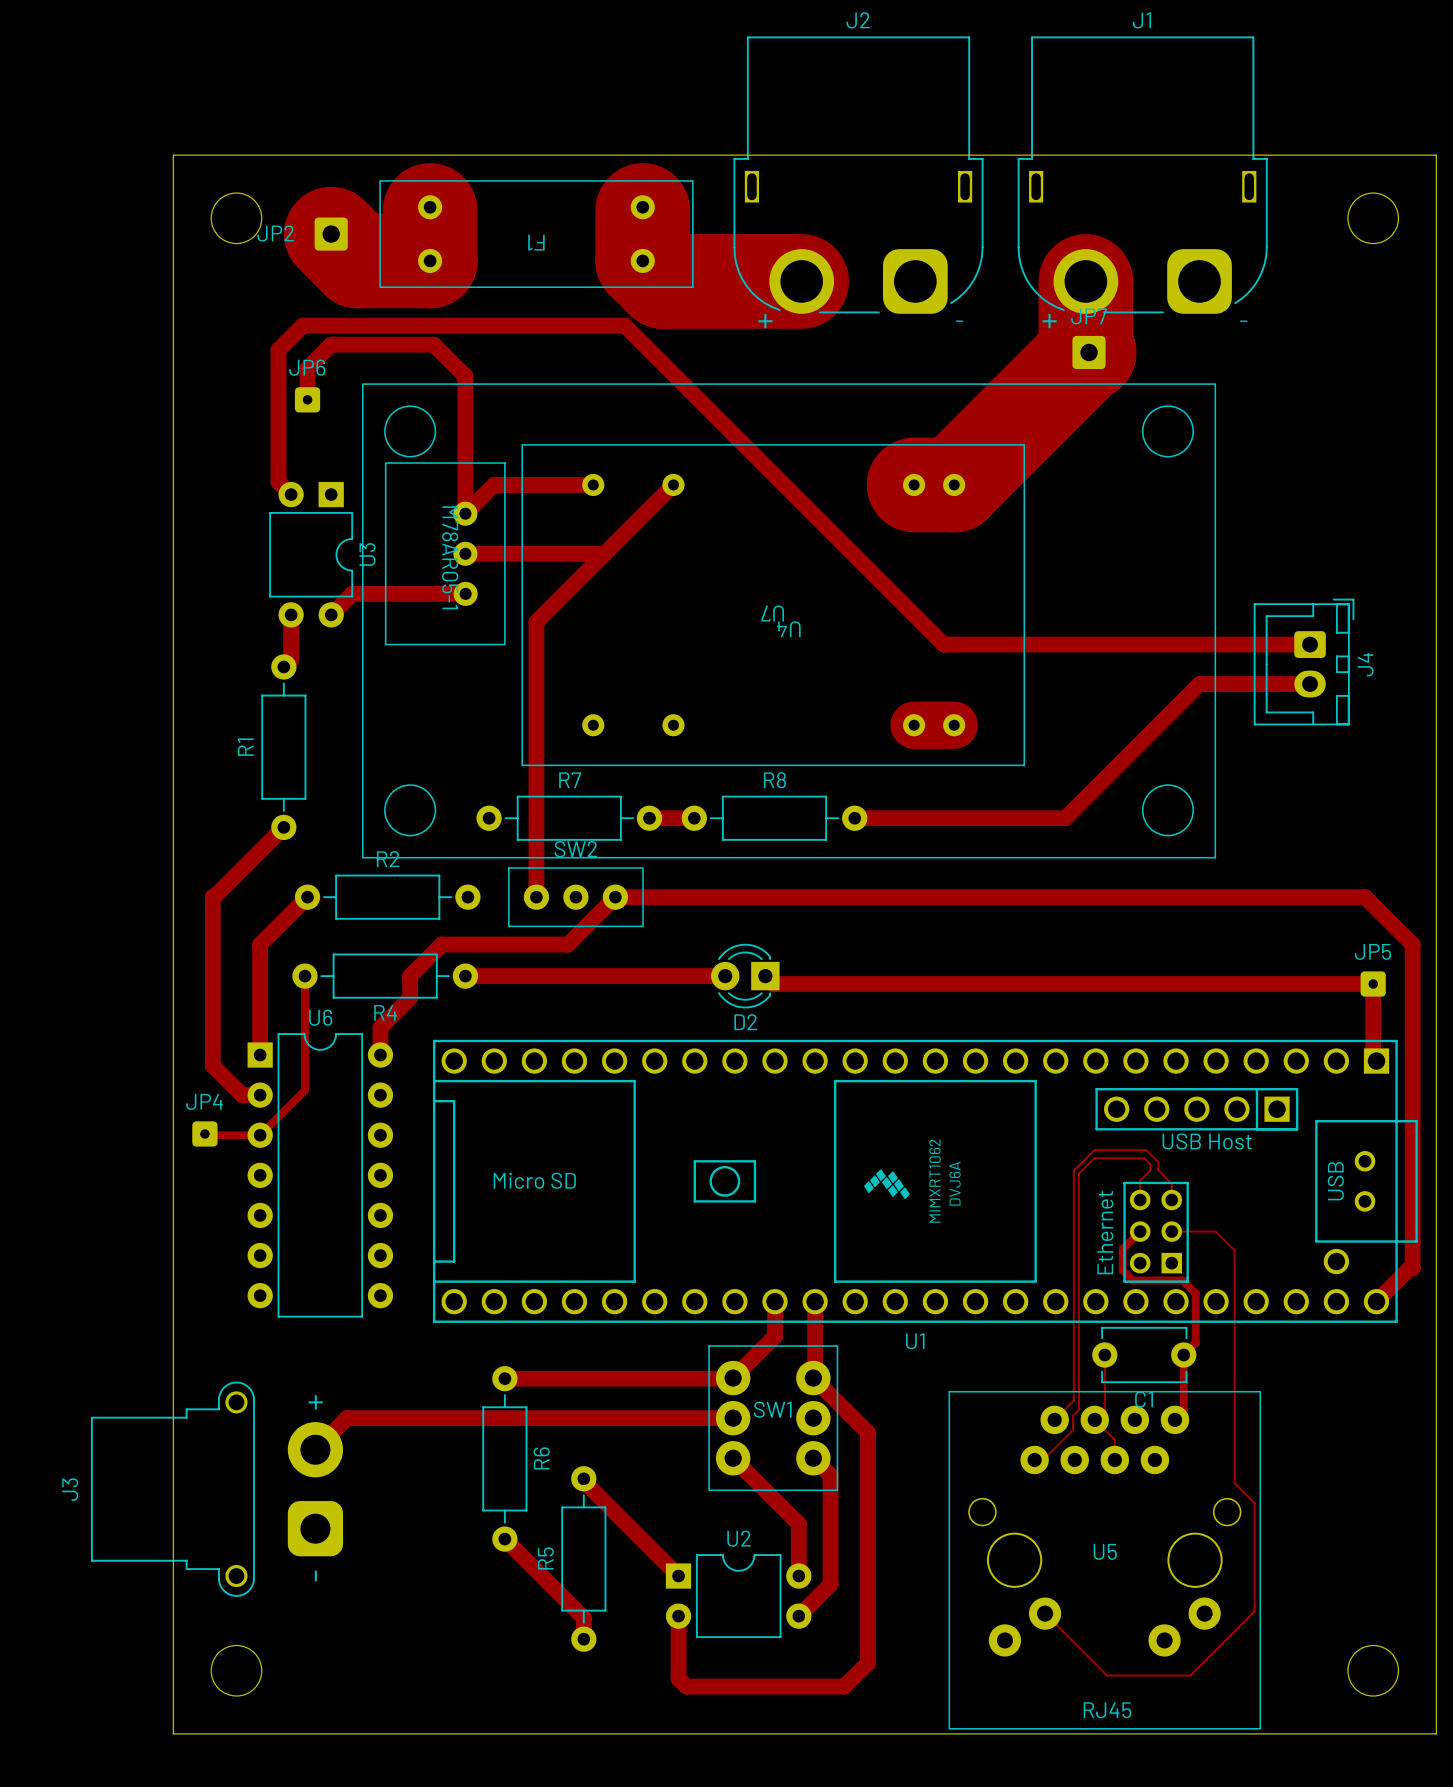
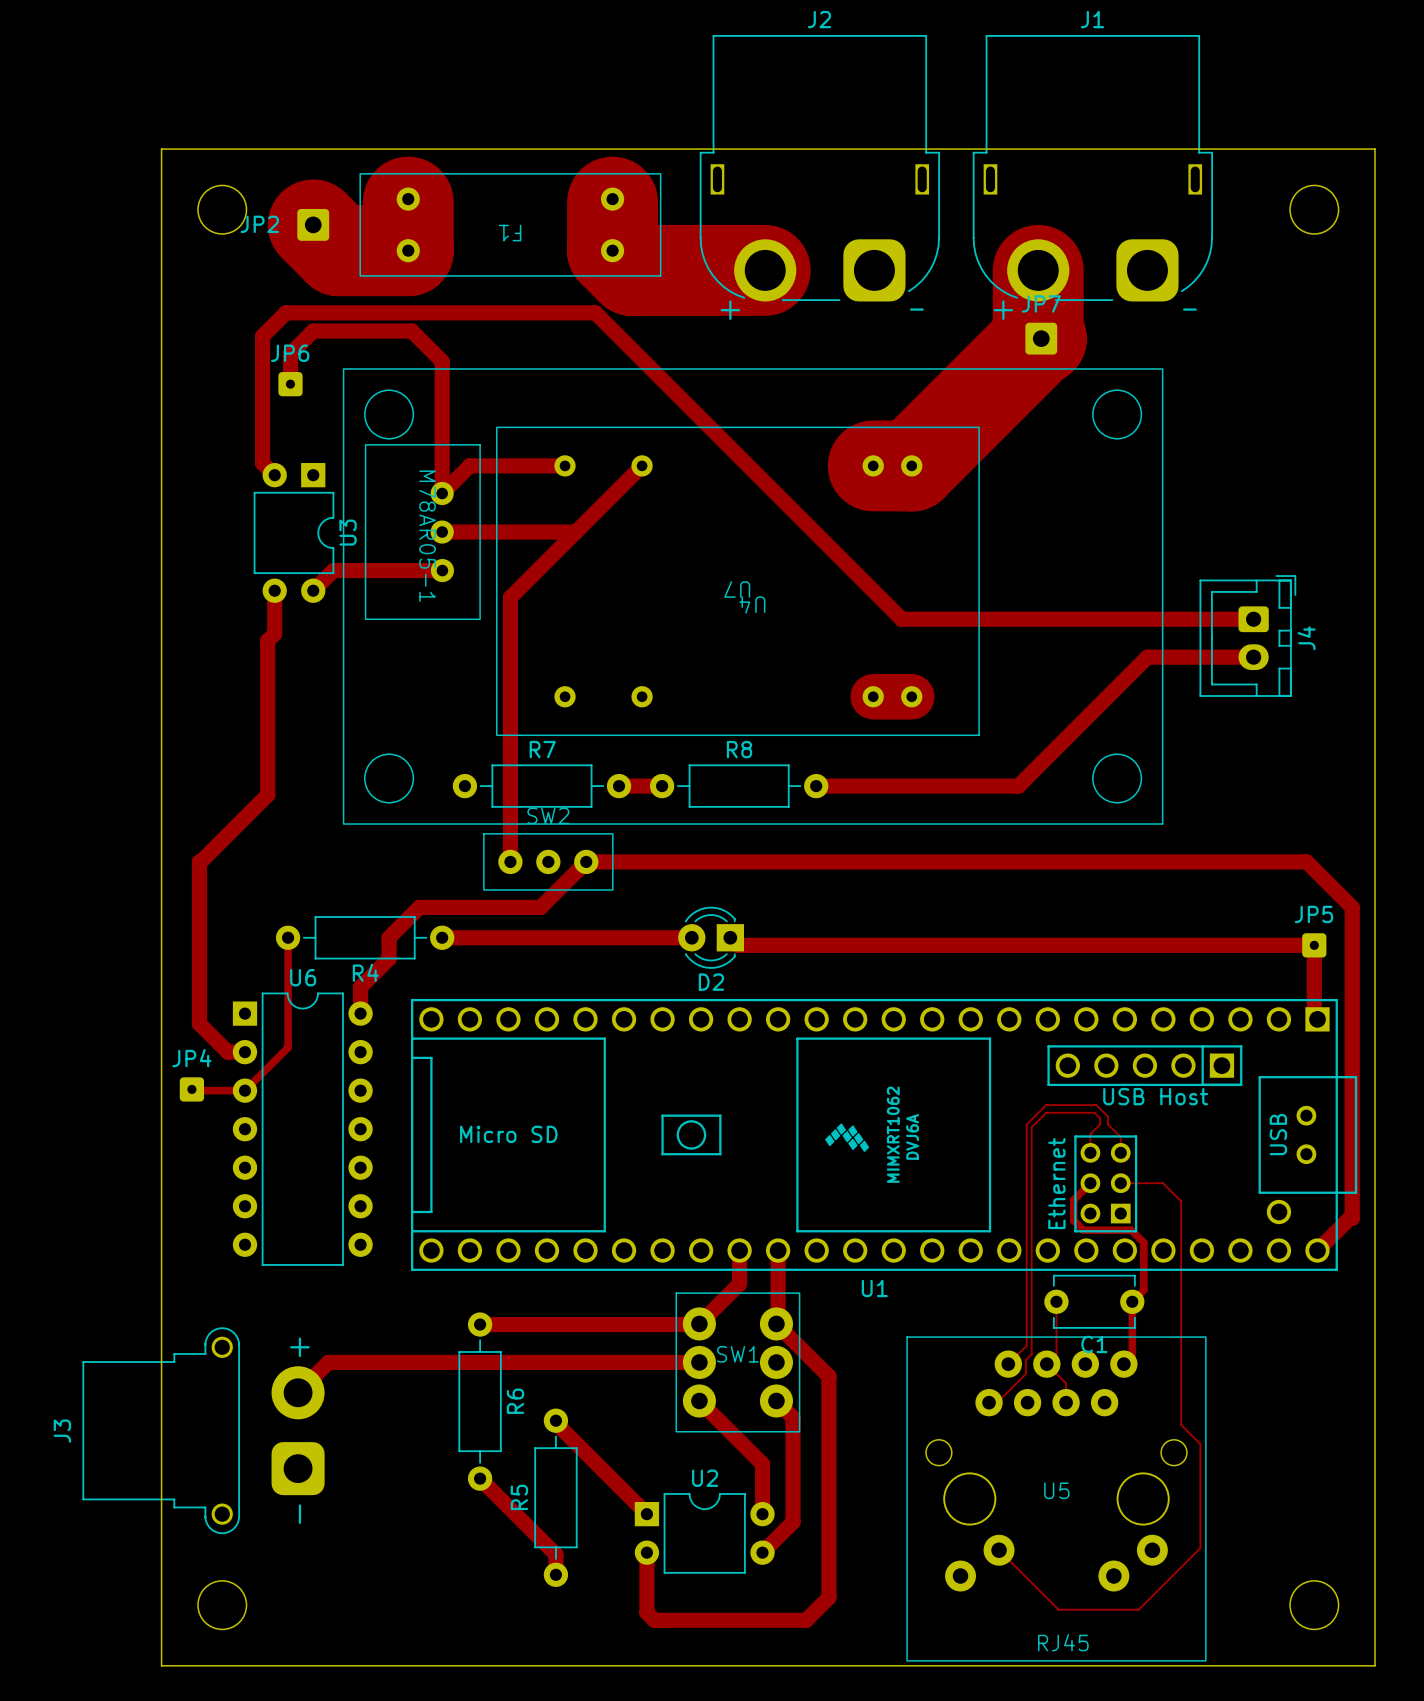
track: none -> (267, 640) (267, 794)
R1: (283, 747) -> none
track: (307, 897) (260, 944) (260, 1055) -> none
R2: (387, 897) -> none

